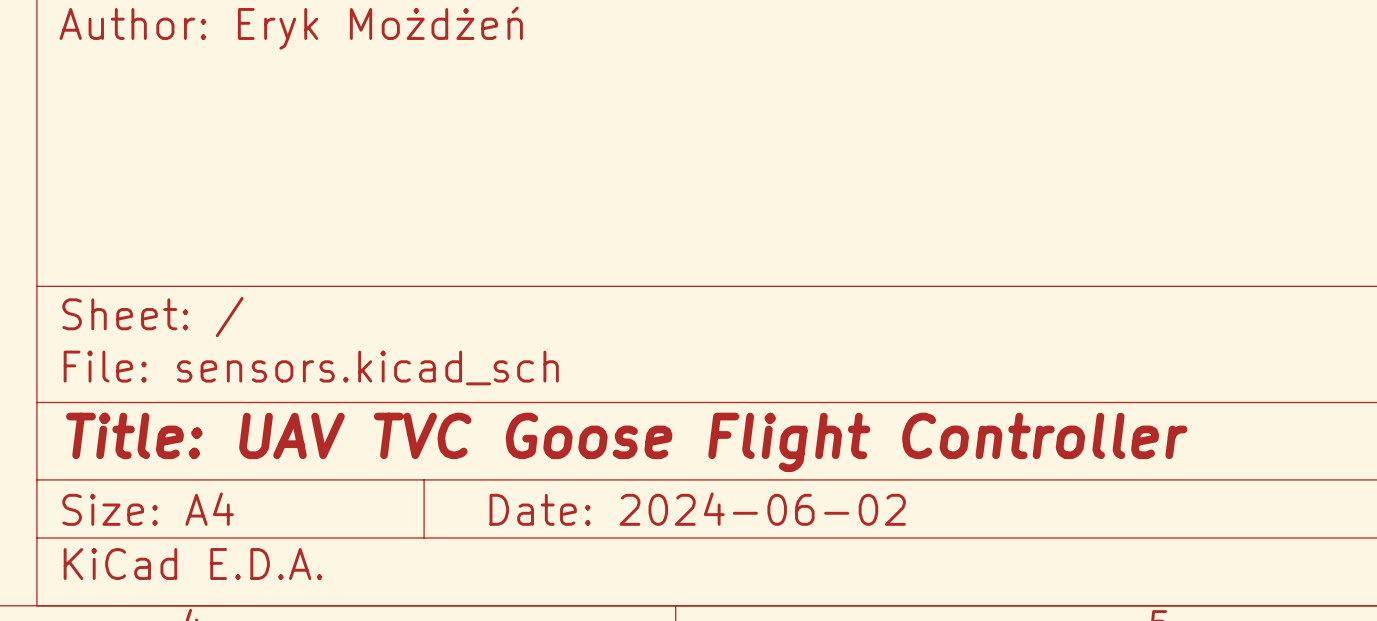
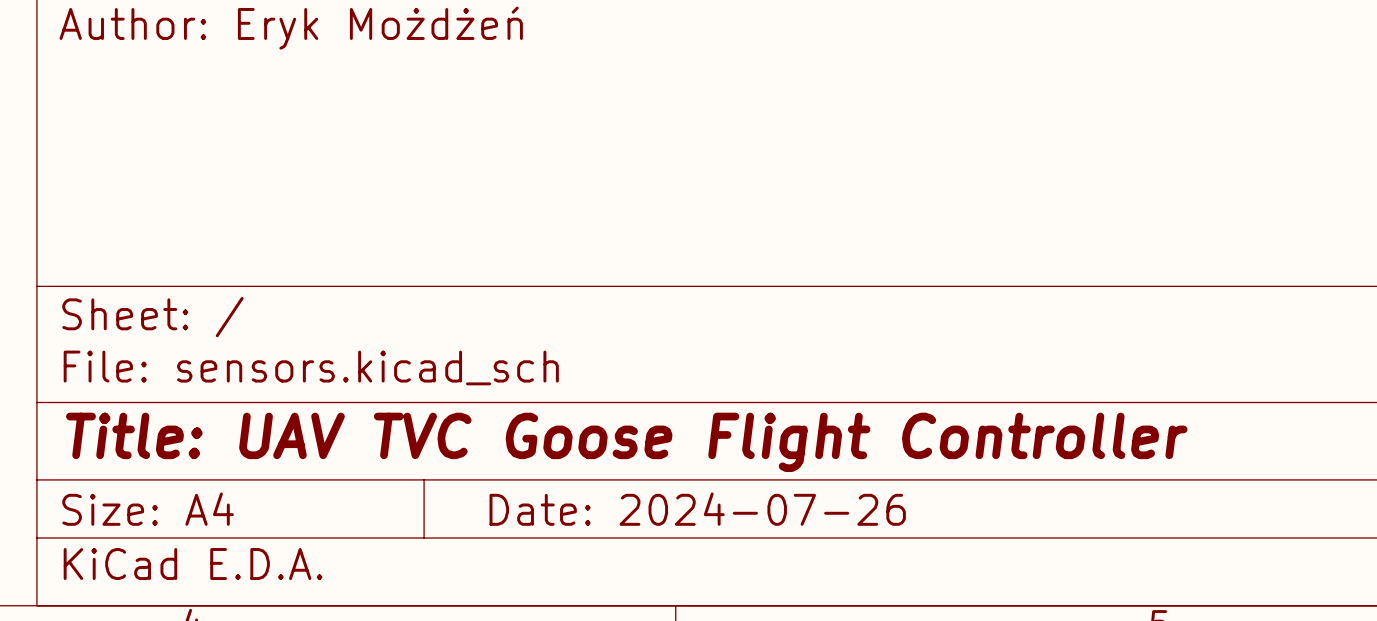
title block: Date: 2024-06-02 (697, 509) -> Date: 2024-07-26 (697, 509)

